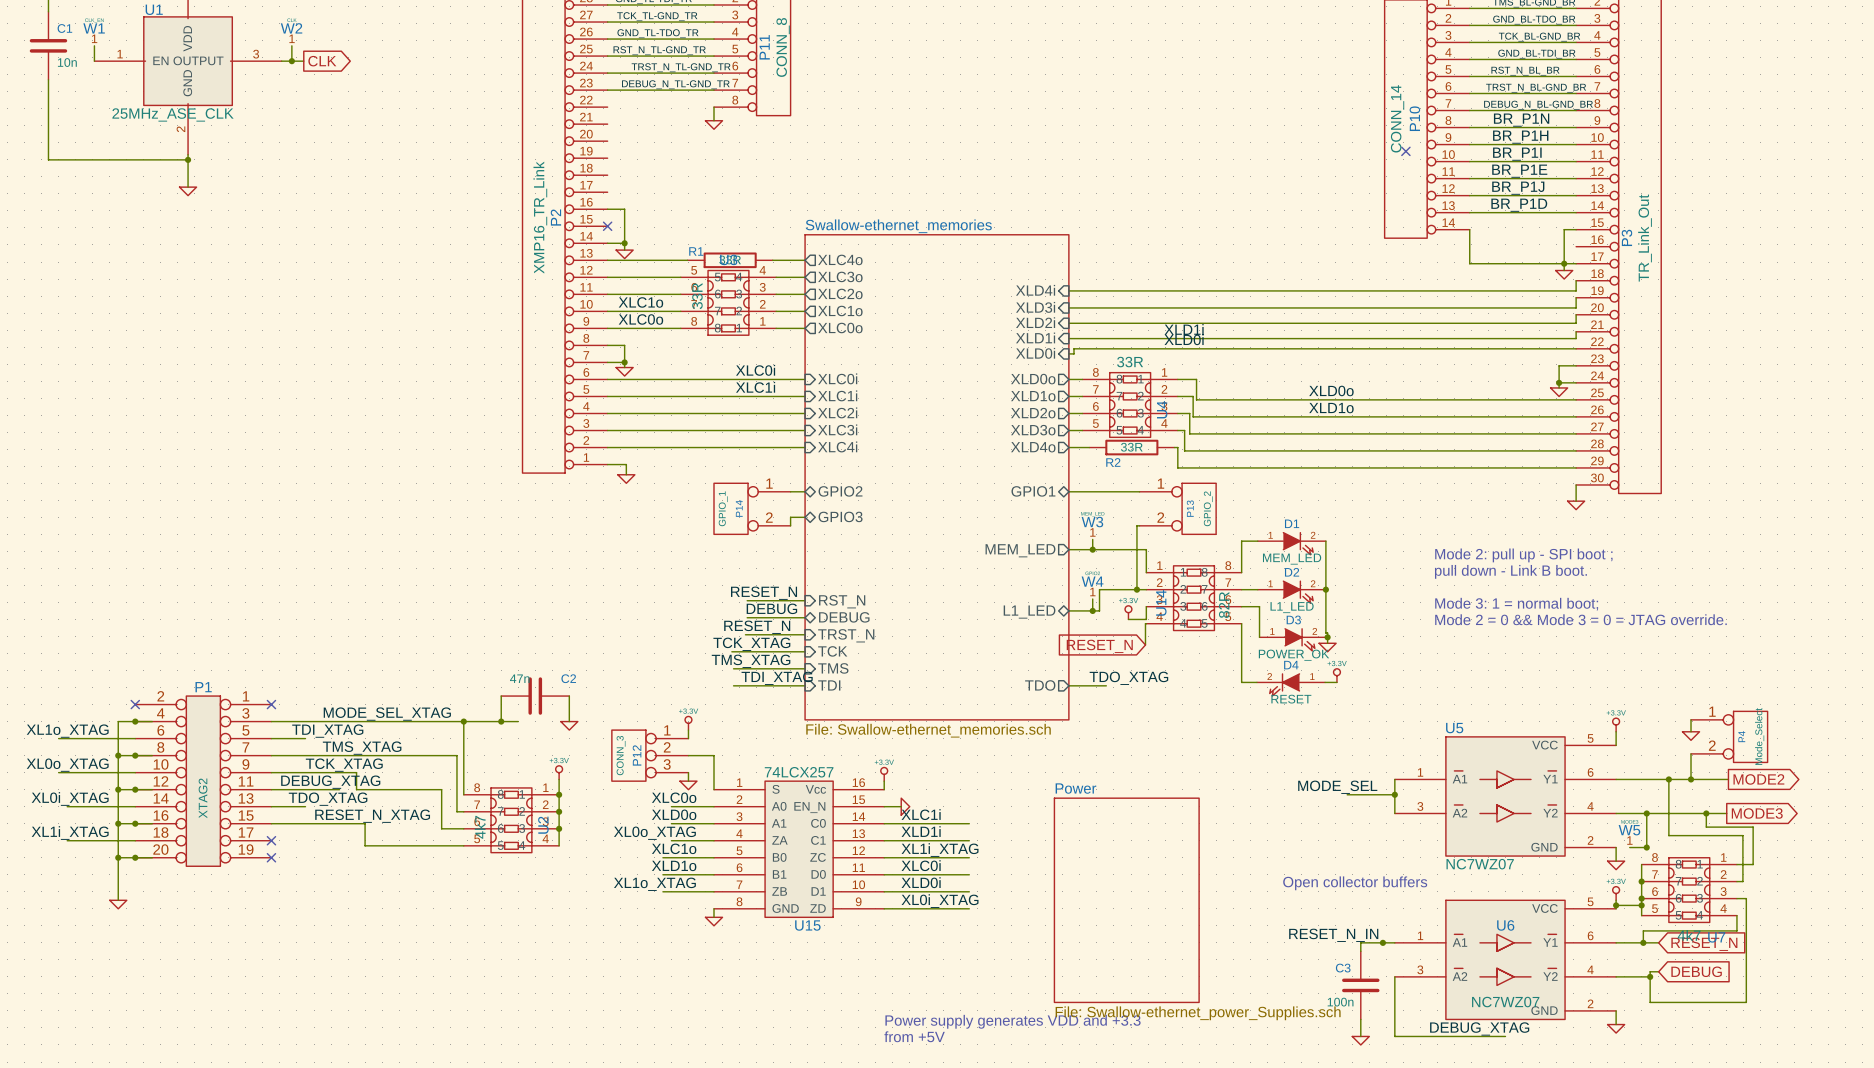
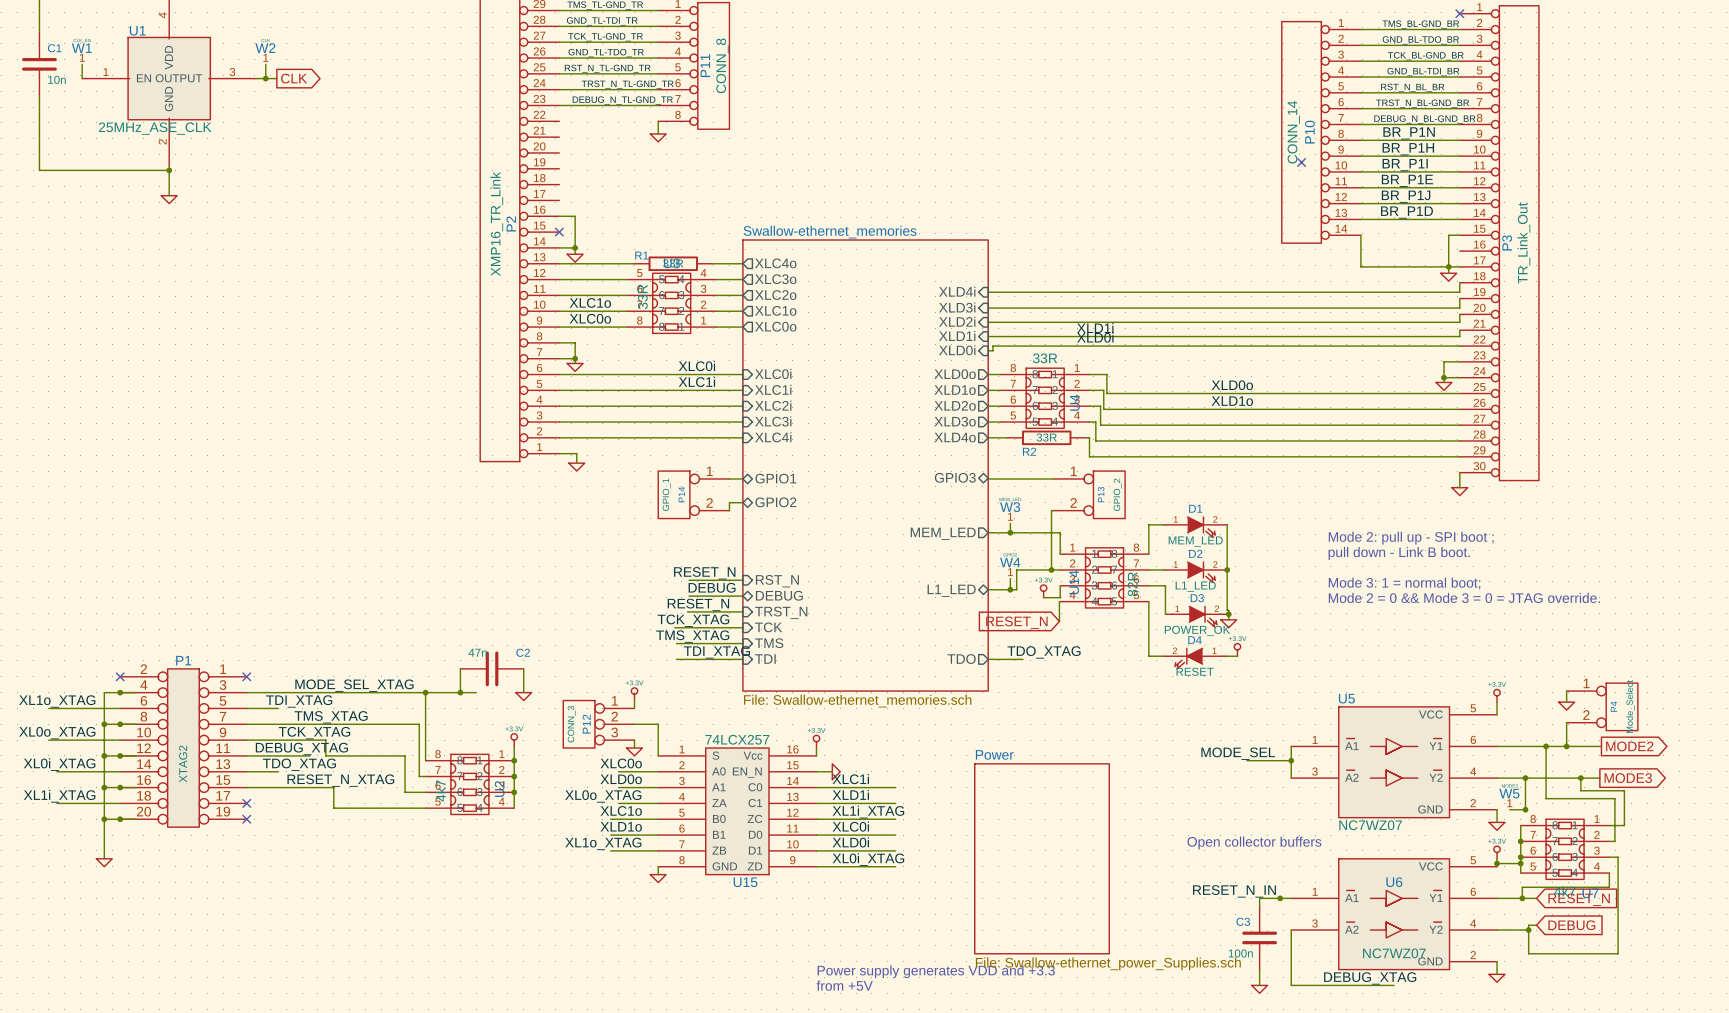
sheet pin: GPIO2 (840, 491) -> GPIO1 (775, 478)
sheet pin: GPIO1 (1033, 491) -> GPIO3 (955, 477)
sheet pin: GPIO3 (840, 516) -> GPIO2 (775, 502)

